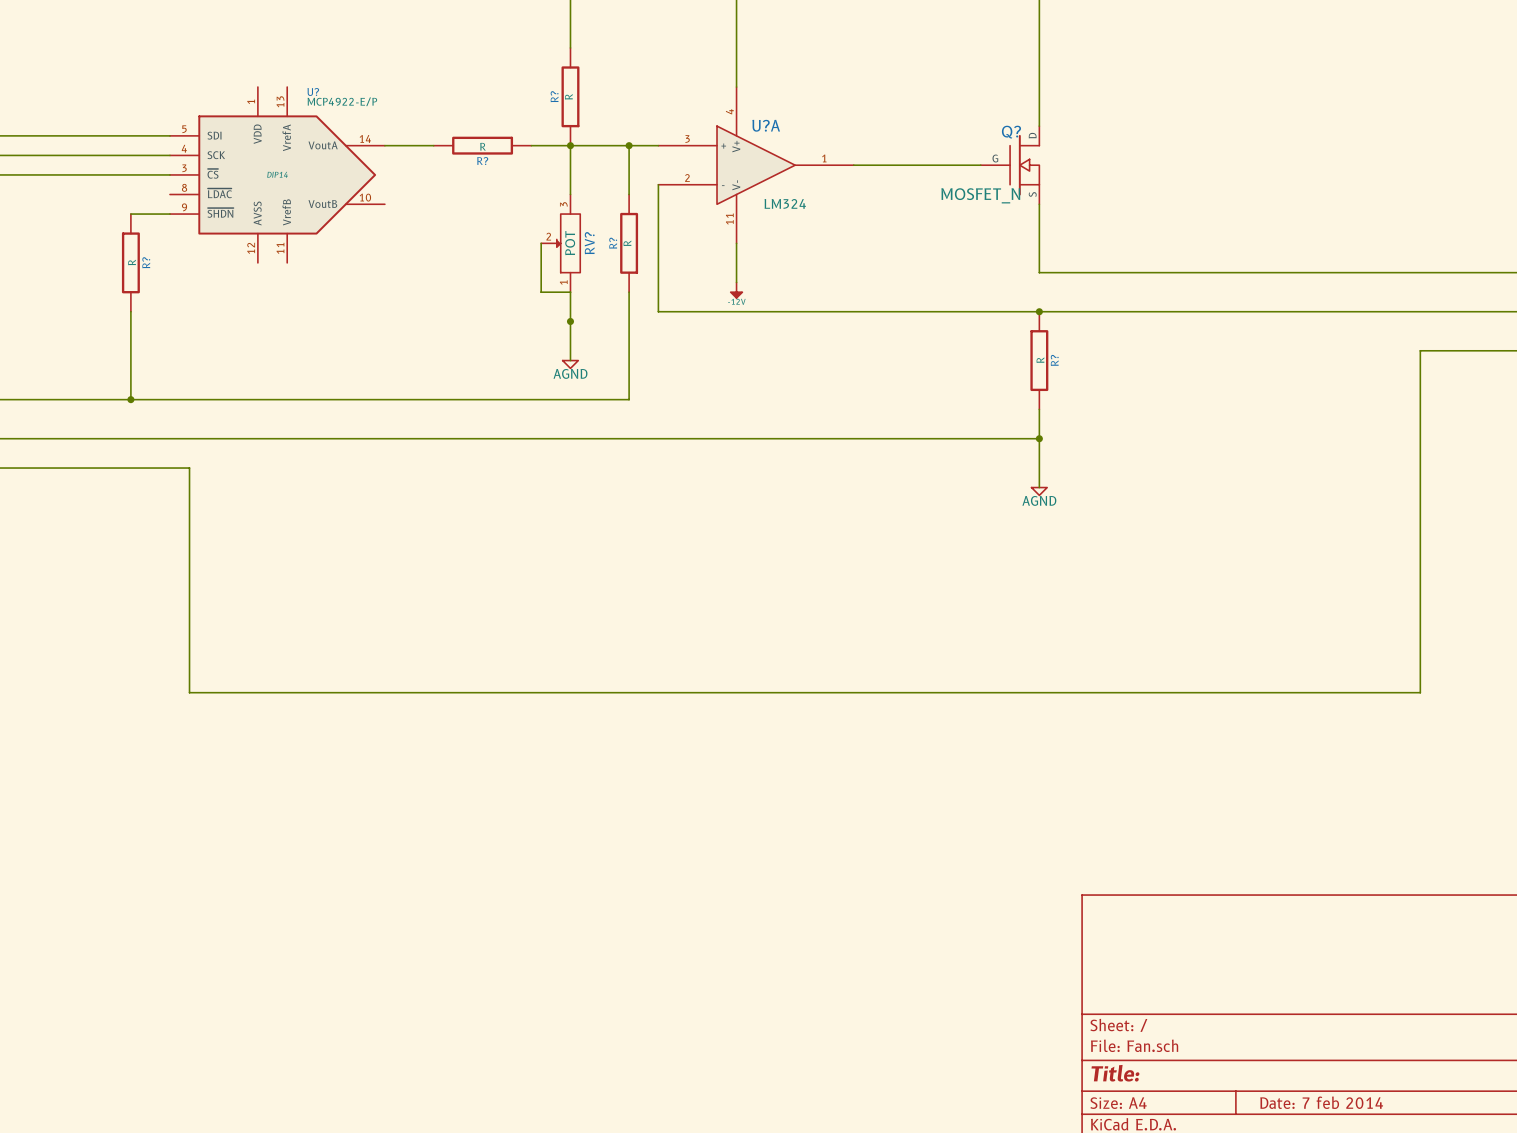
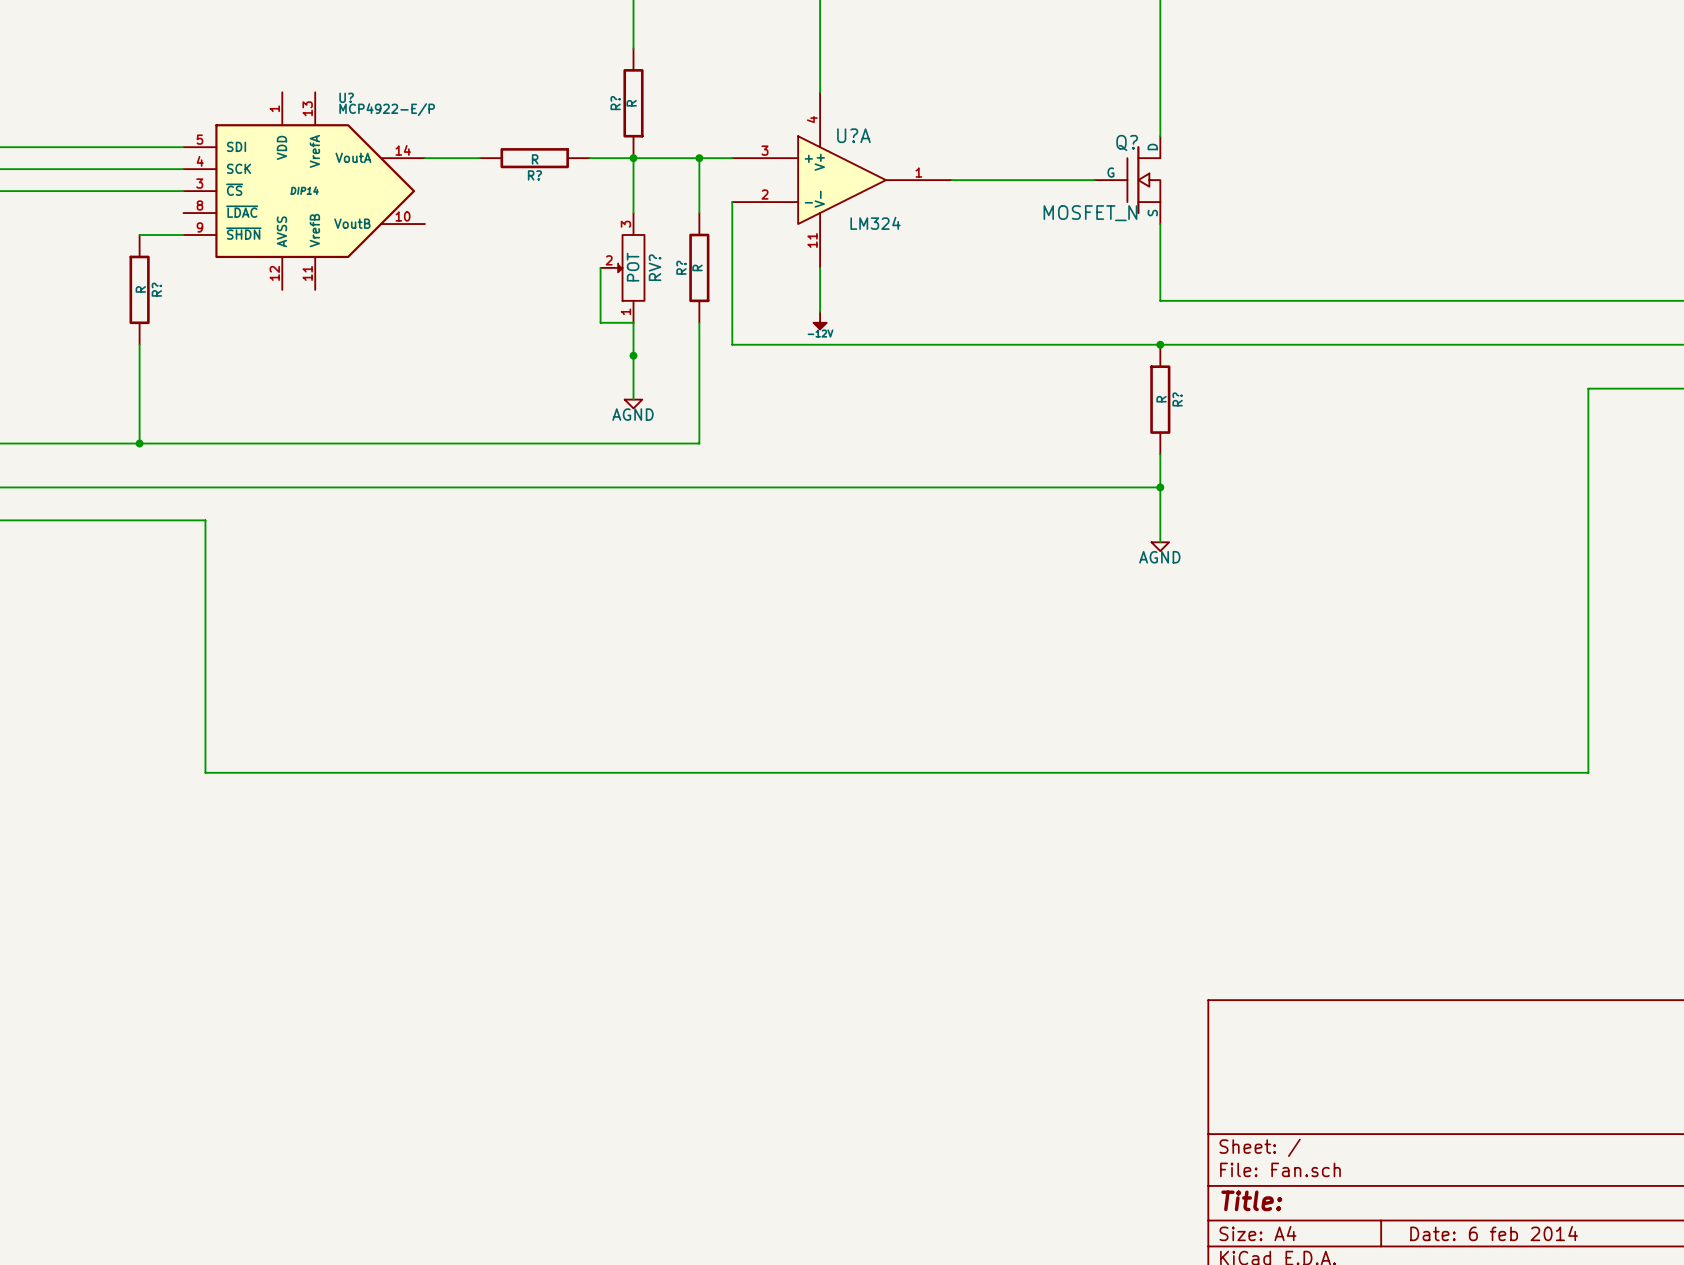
title block: Date: 7 feb 2014 (1321, 1102) -> Date: 6 feb 2014 (1494, 1233)

